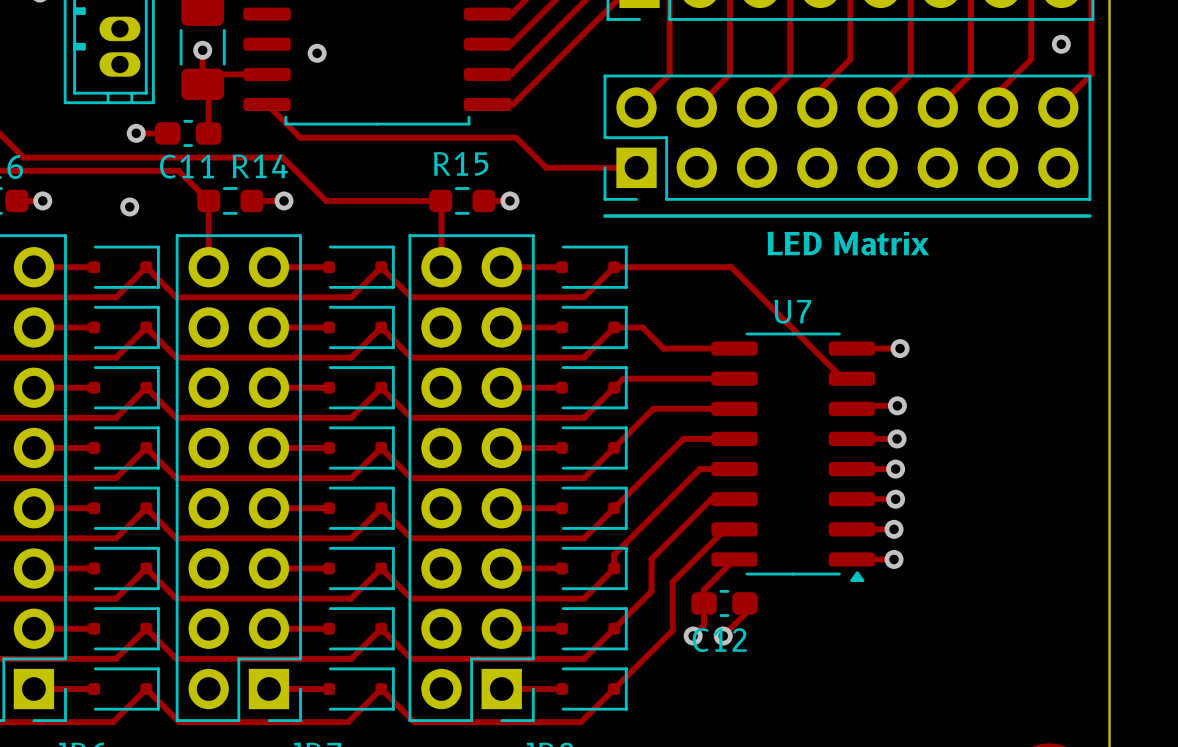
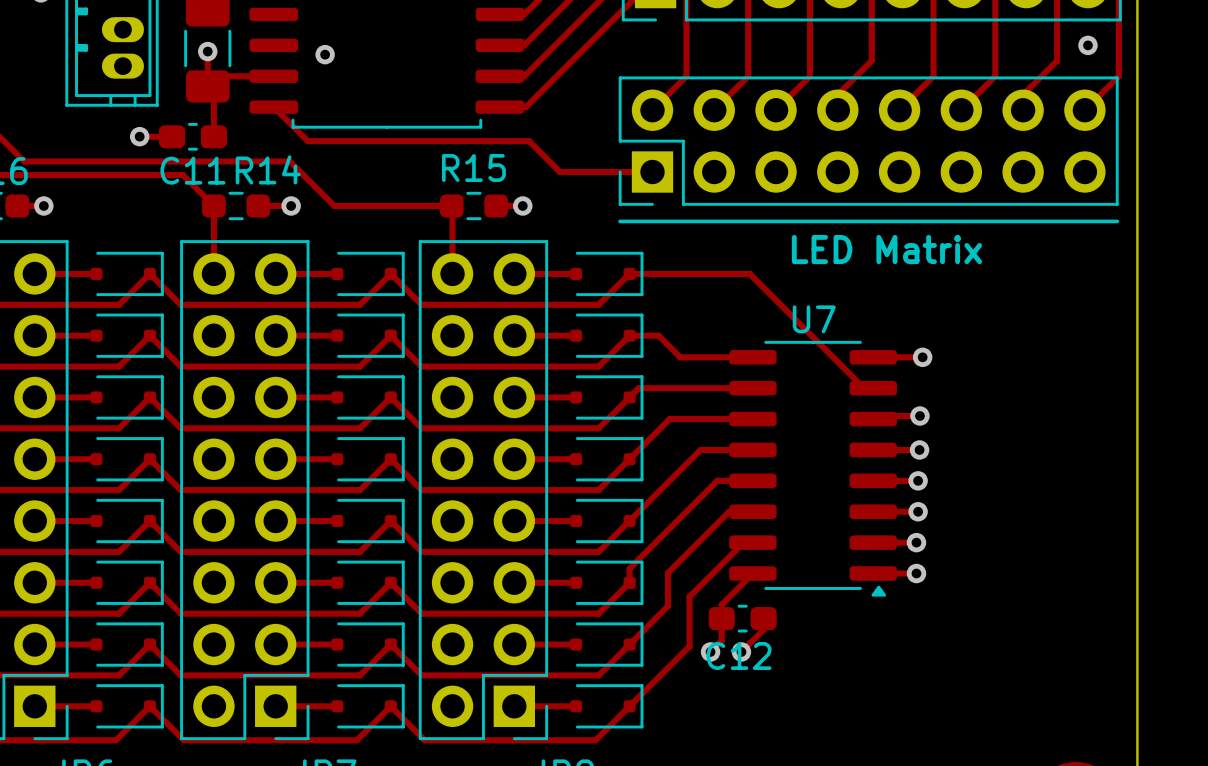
via: (129, 206) -> none

